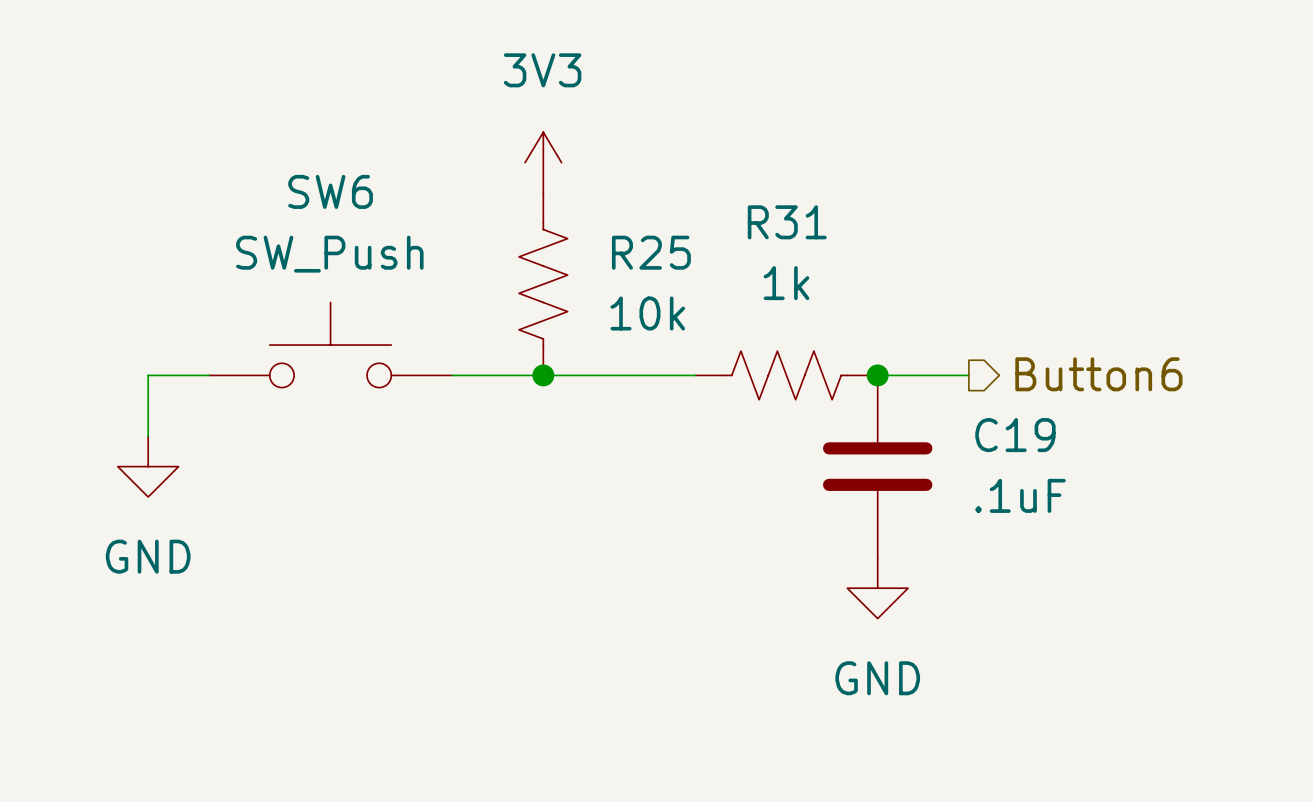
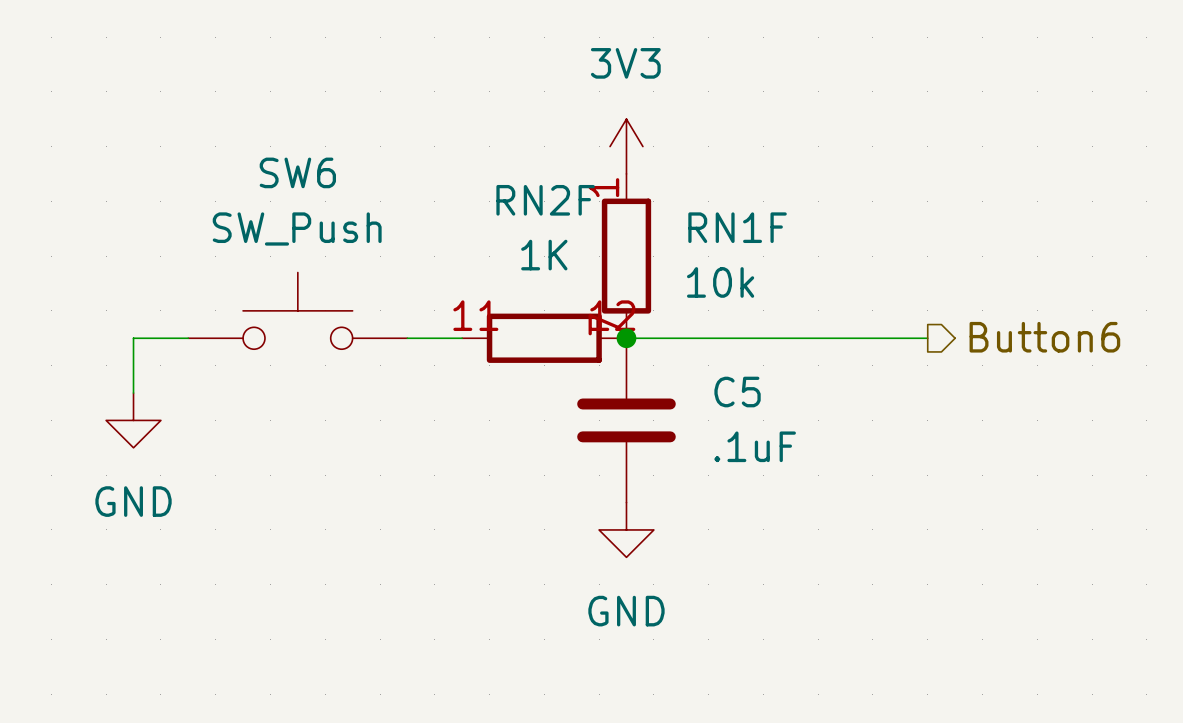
power symbol position: 3V3 (543, 162) -> 3V3 (626, 146)
R25: 10k (543, 284) -> none
RN1F: none -> 10k (626, 256)
hierarchical label position: Button6 (1098, 374) -> Button6 (1044, 337)
wire: (512, 375) (695, 375) -> (790, 338) (626, 338)
junction: (543, 375) -> none
RN2F: none -> 1K (544, 338)
junction: none -> (626, 338)
R31: 1k (786, 375) -> none
junction: (877, 375) -> none
wire: none -> (872, 338) (927, 338)
C5: none -> .1uF (626, 420)
C19: .1uF (877, 466) -> none
power symbol position: GND (877, 588) -> GND (626, 529)

